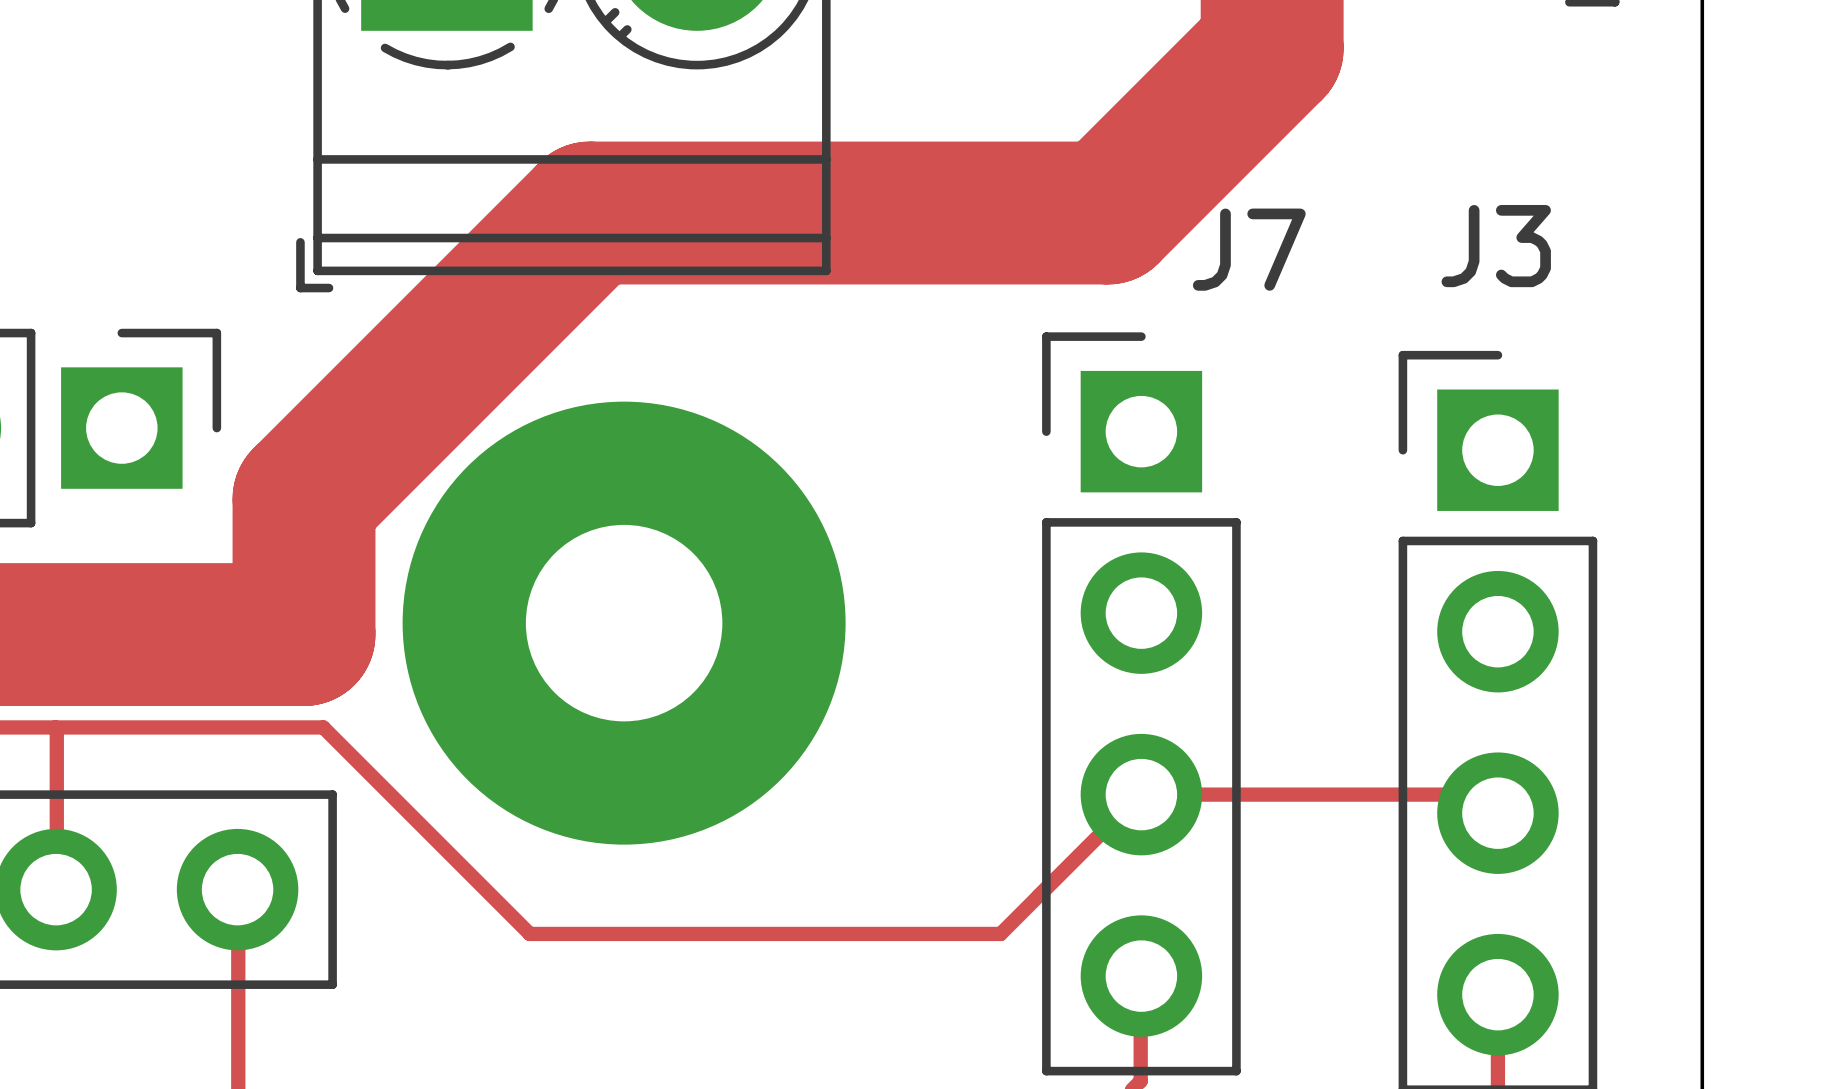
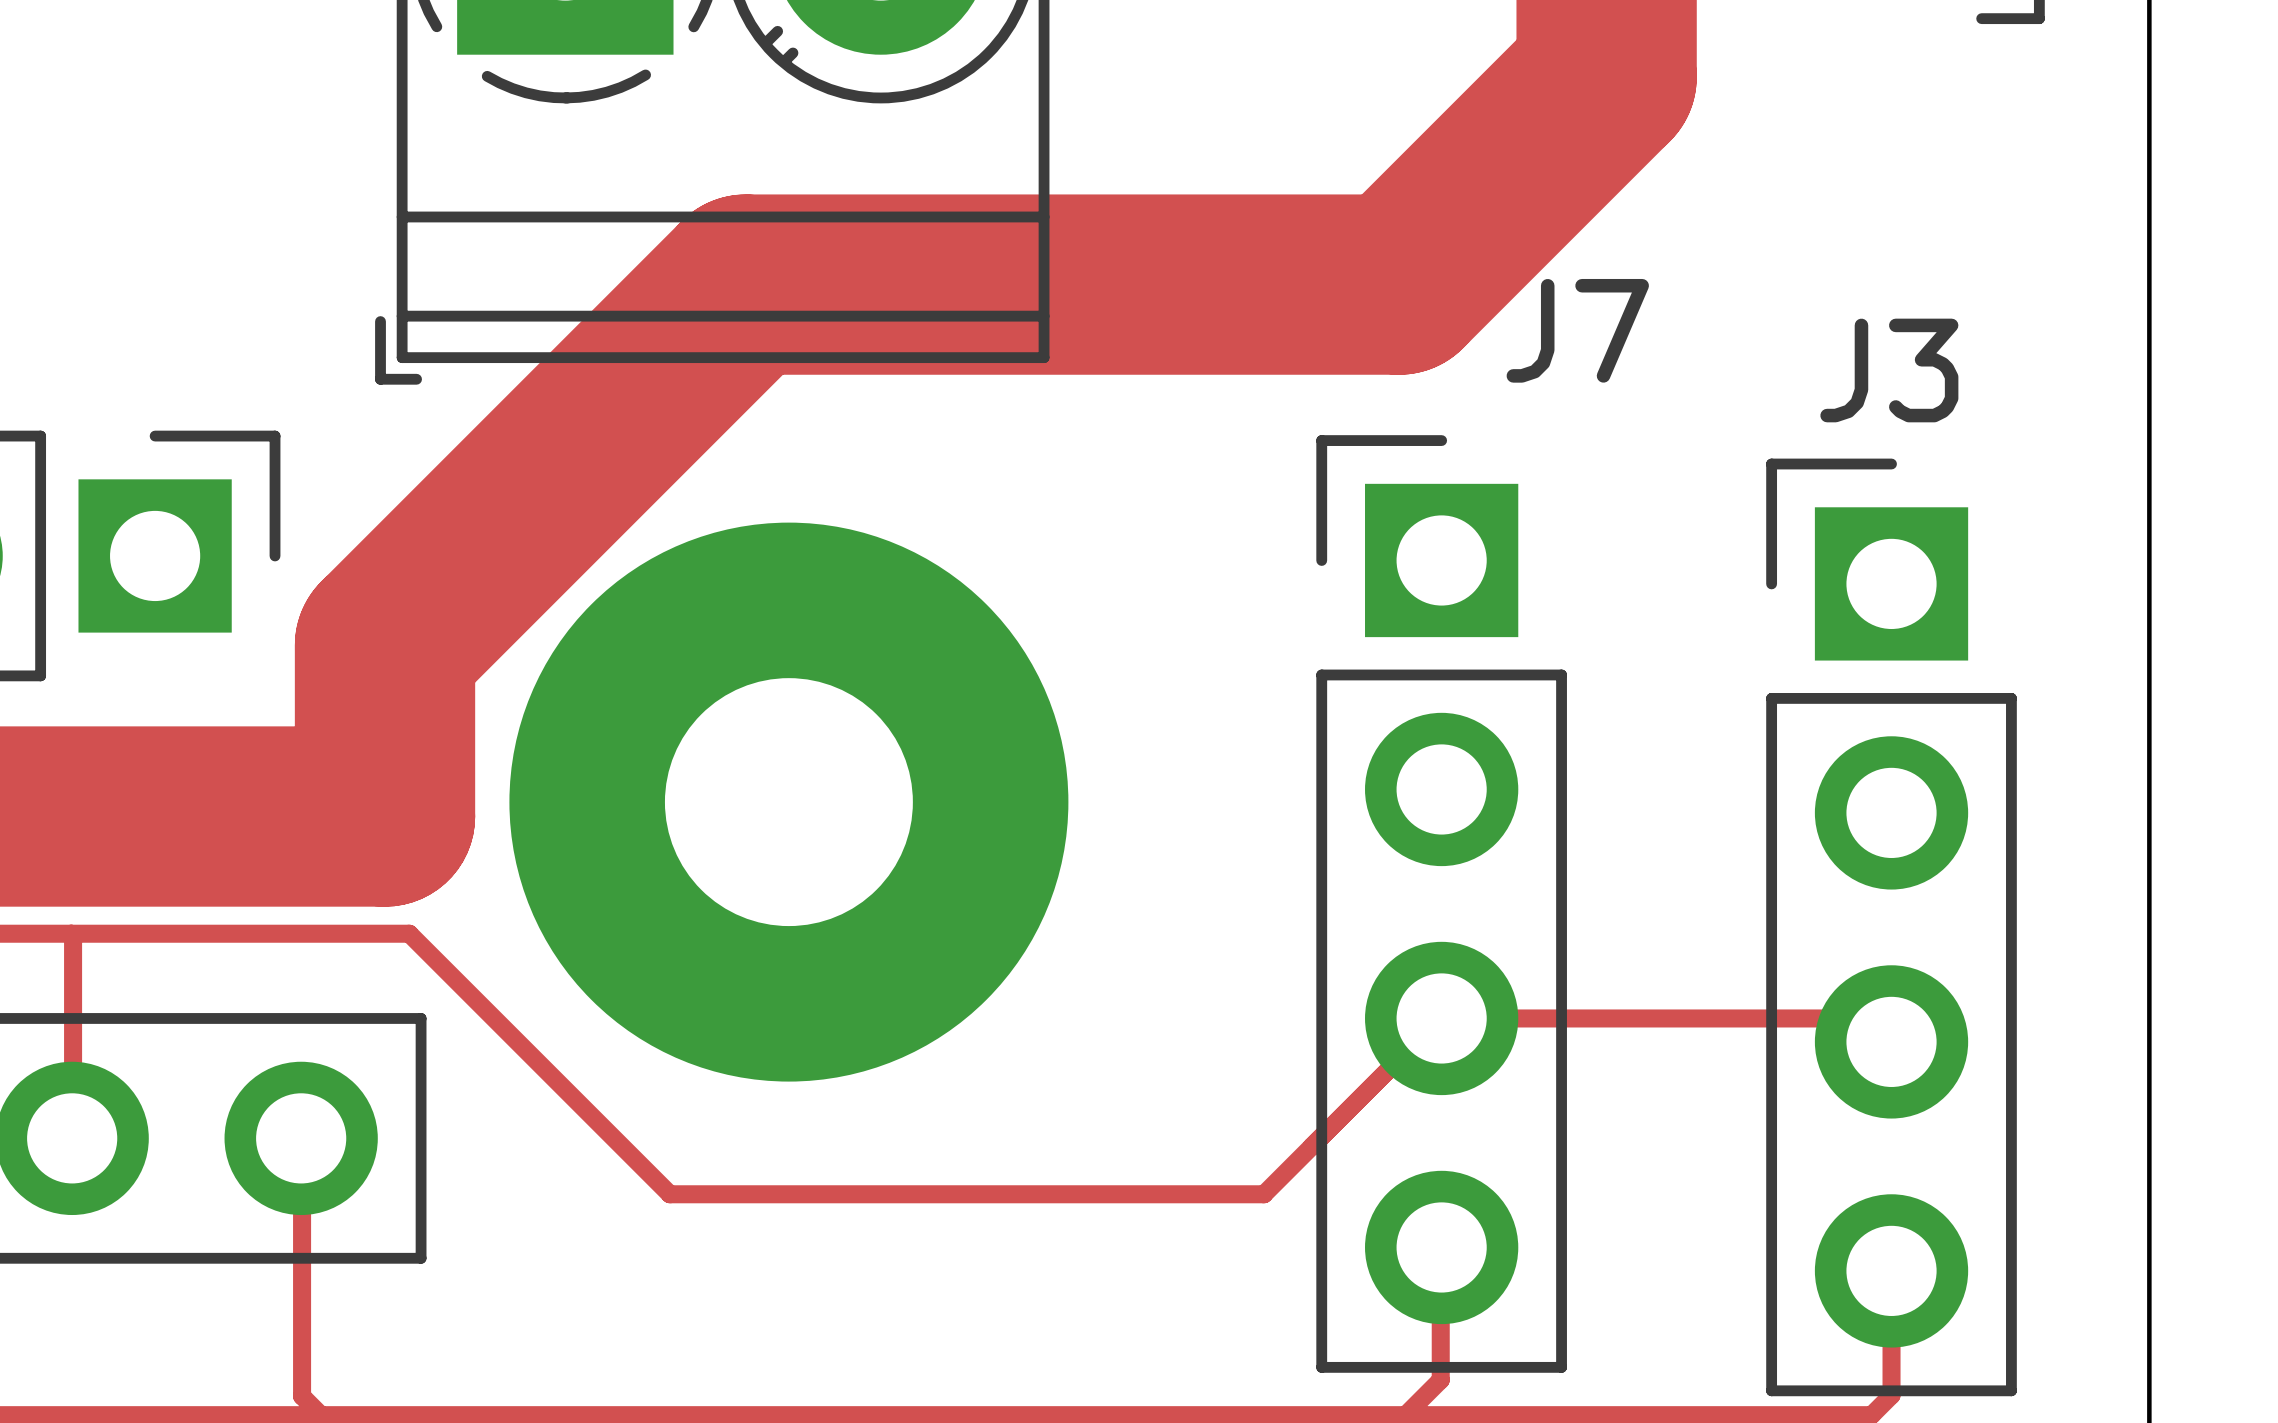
J3 name position: J3 (1496, 246) -> J3 (1889, 370)

